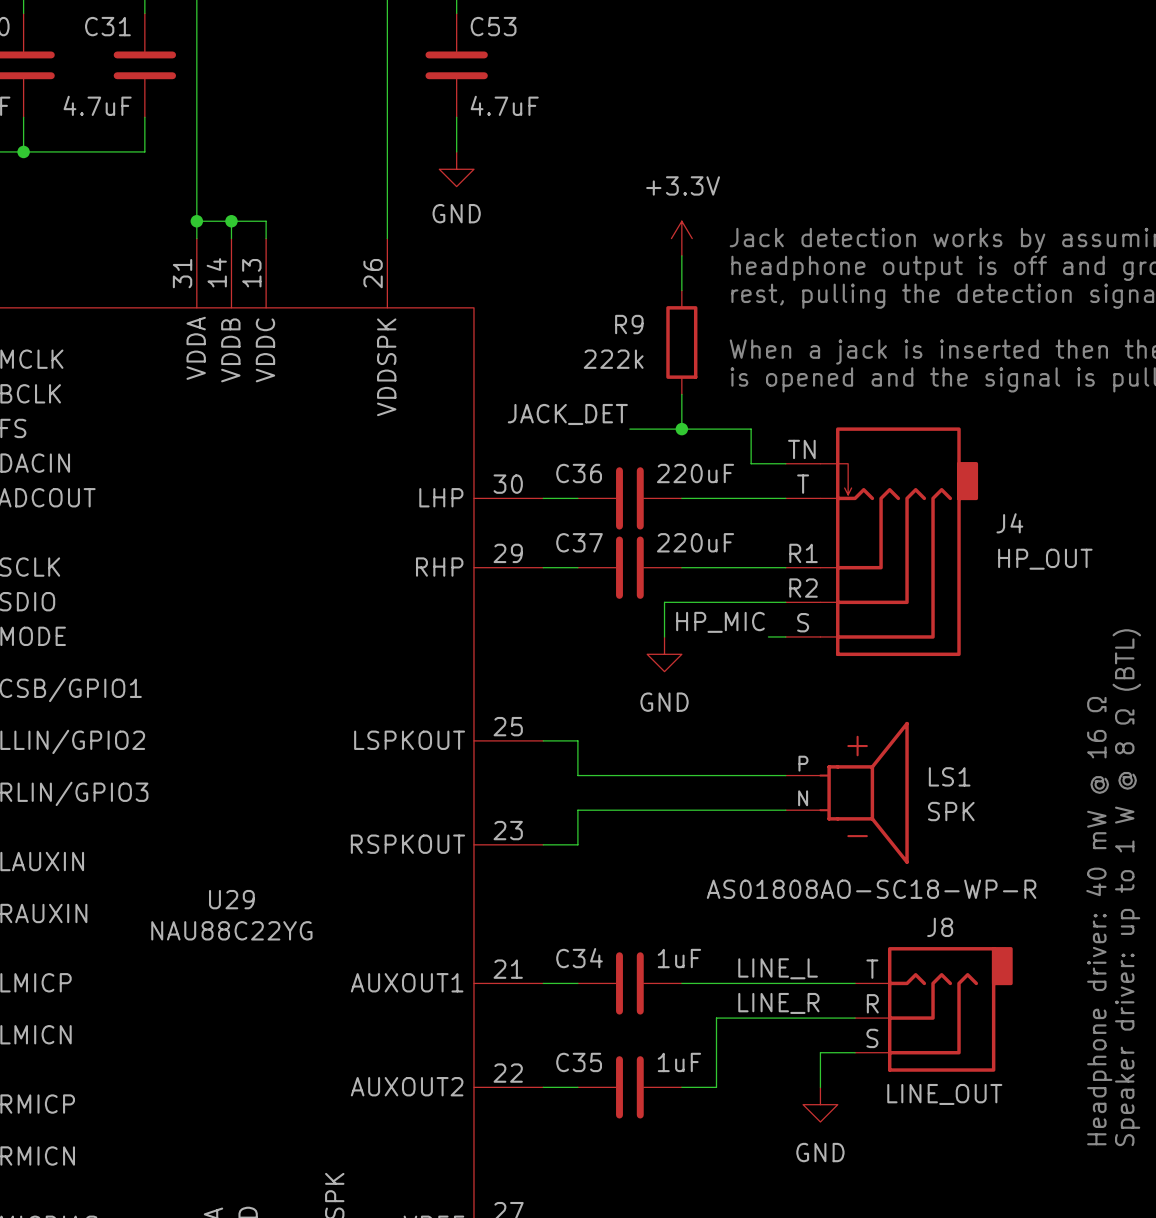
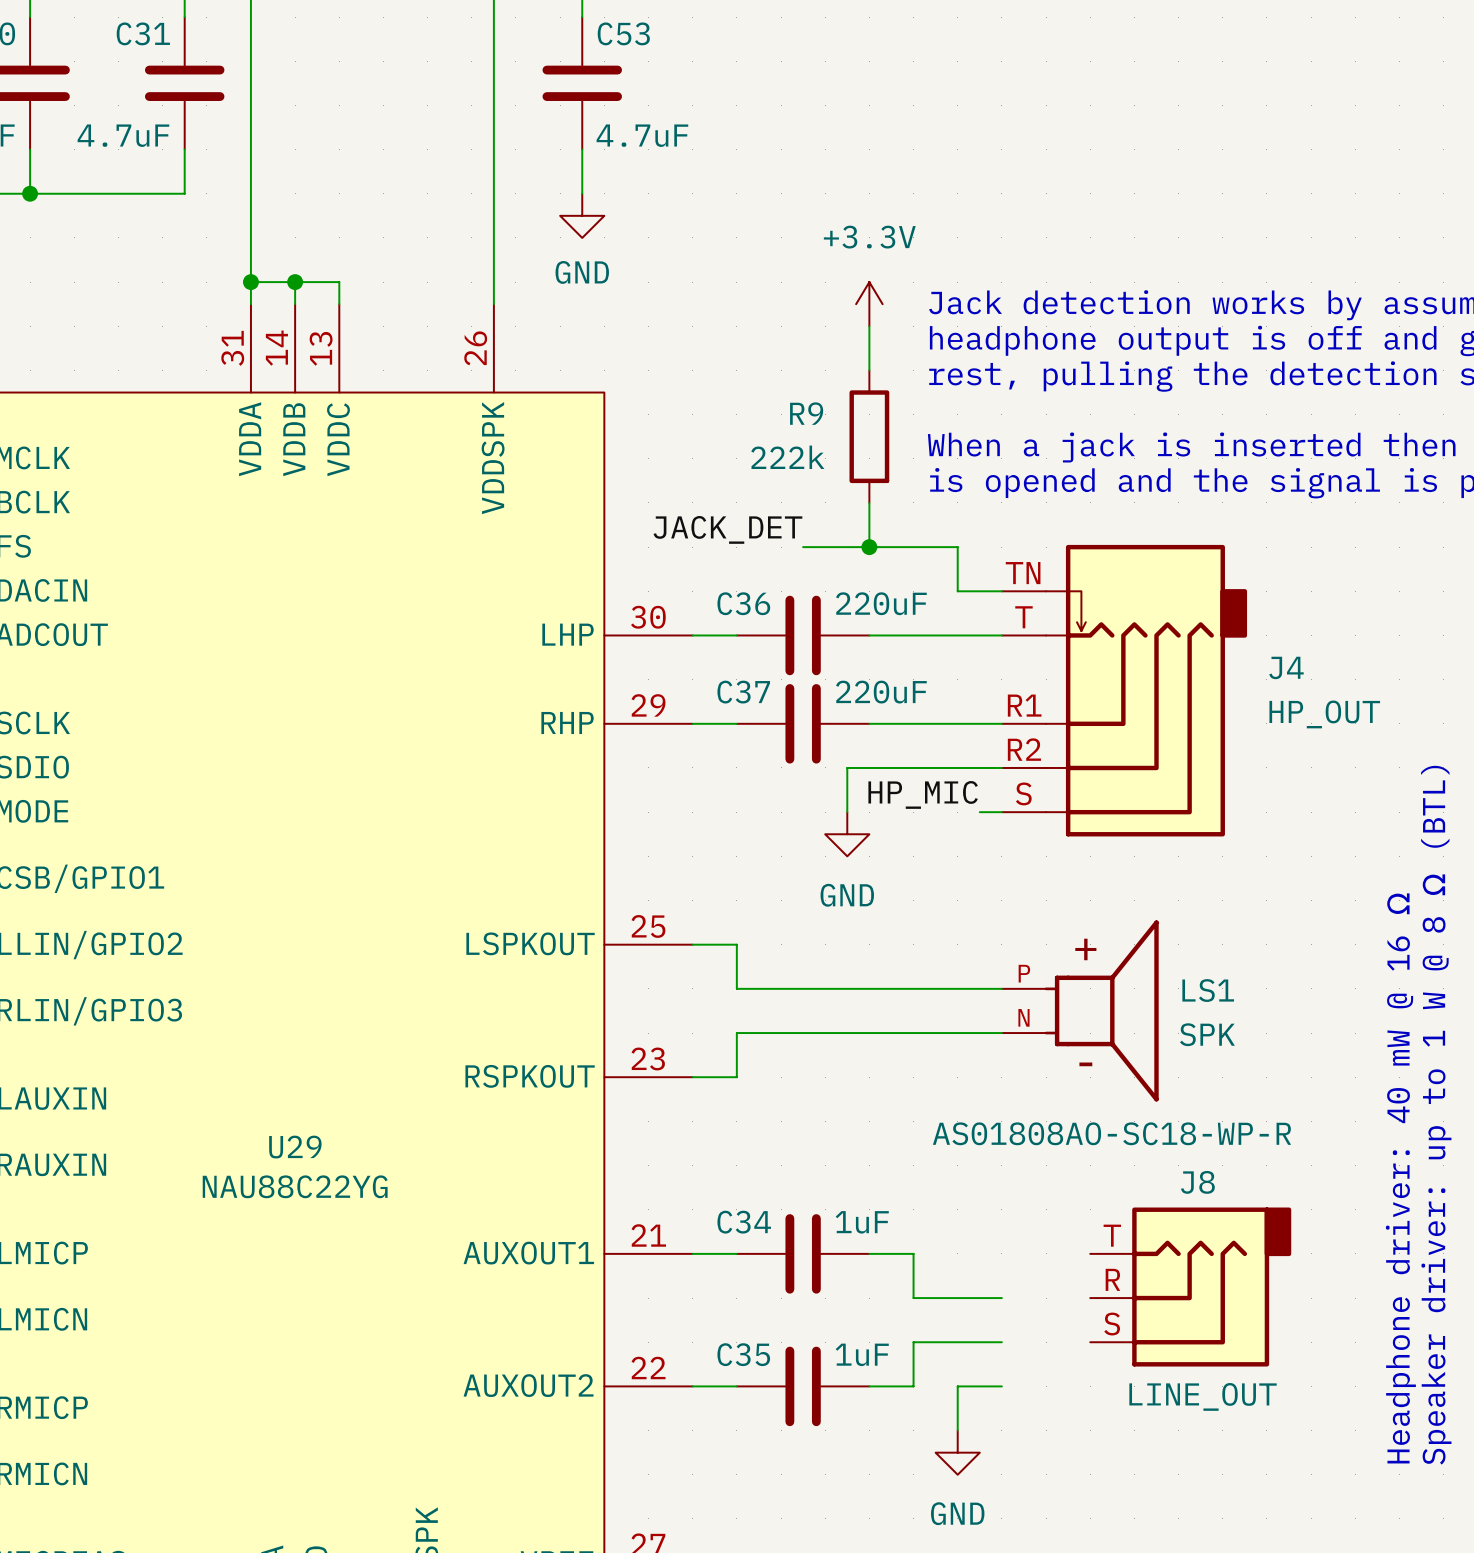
label: LINE_L (778, 968) -> none
wire: (716, 983) (855, 983) -> none
label: LINE_R (778, 1003) -> none
wire: (716, 1018) (716, 1052) -> (913, 1298) (913, 1253)
wire: (785, 1018) (855, 1018) -> (913, 1342) (1001, 1342)
wire: (855, 1052) (820, 1052) (820, 1087) -> (1001, 1386) (957, 1386) (957, 1430)
power symbol position: GND (820, 1104) -> GND (957, 1452)

